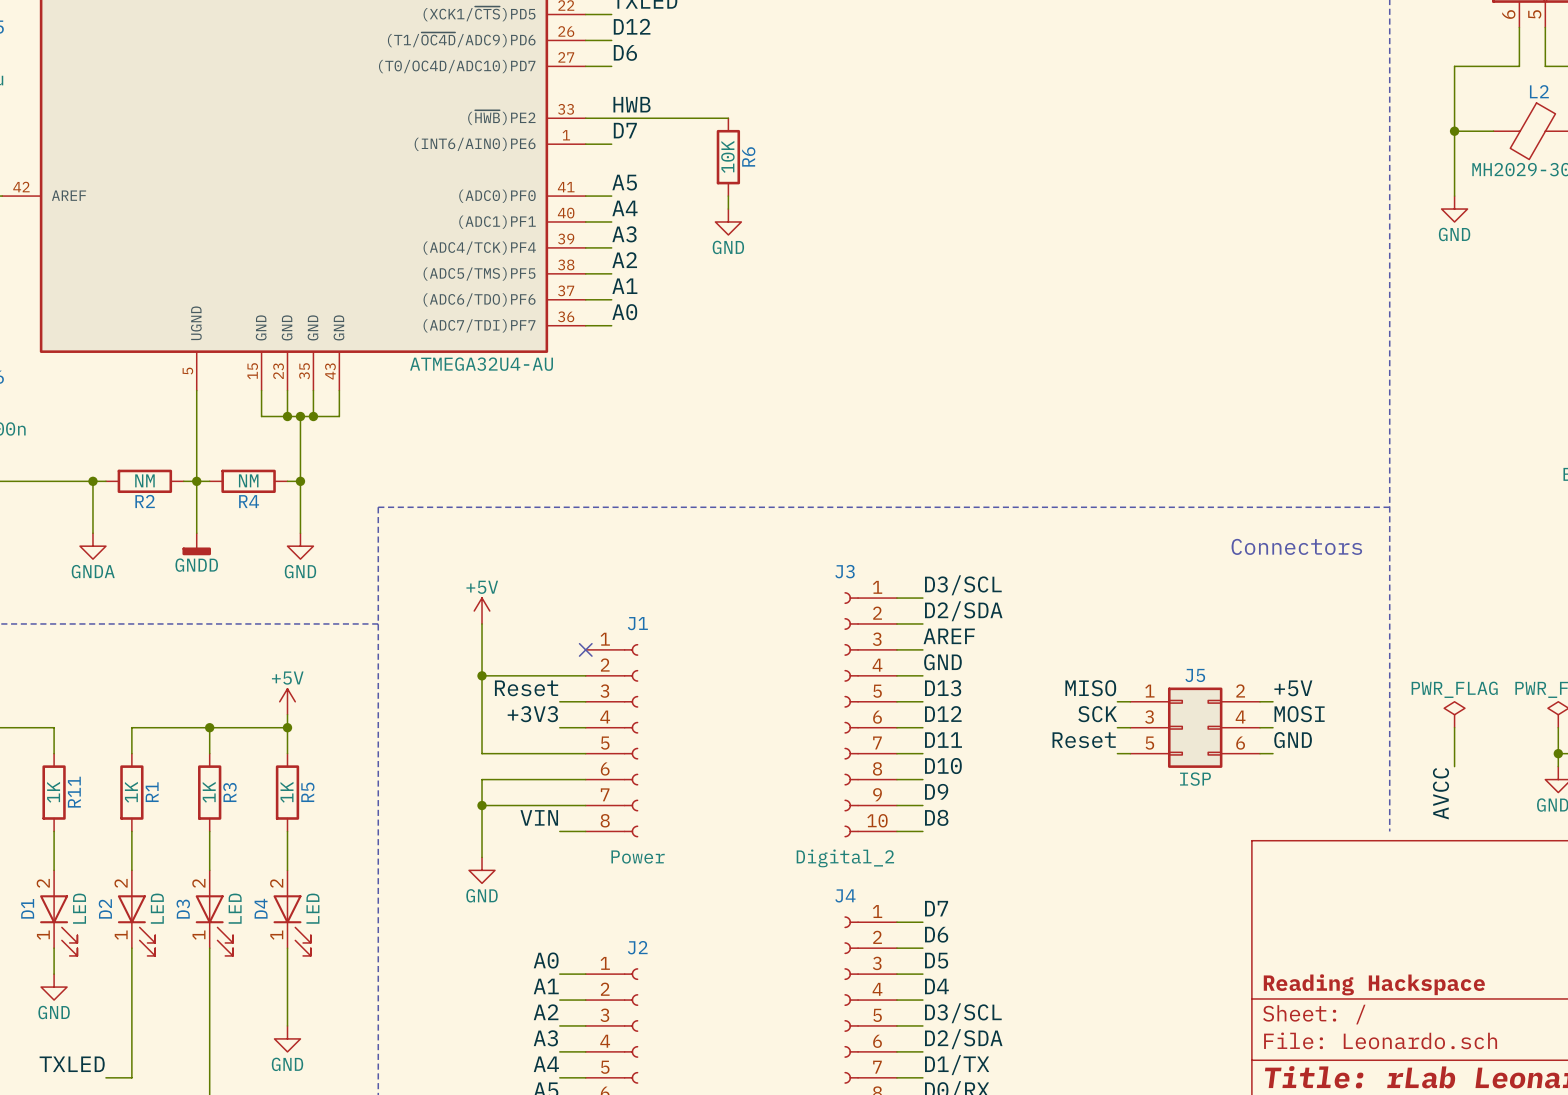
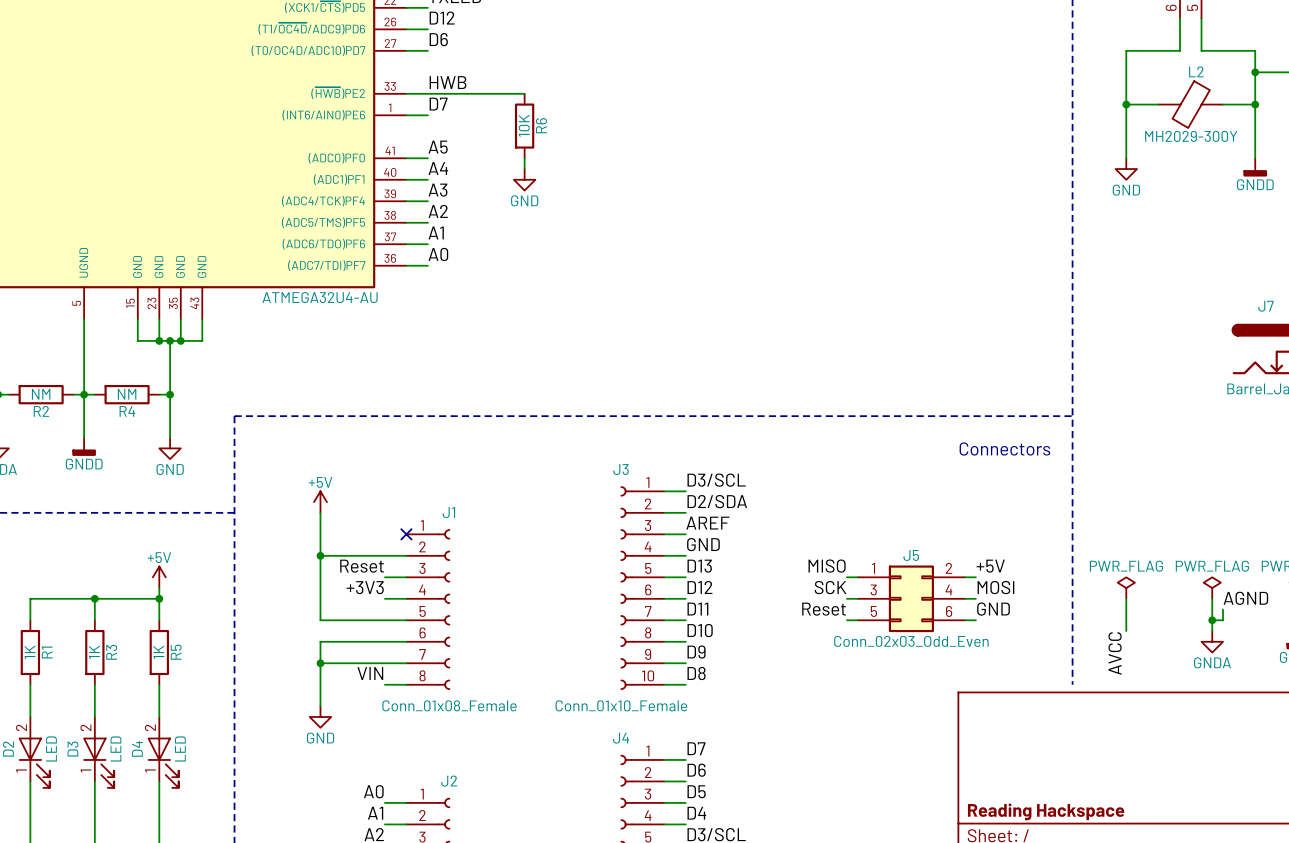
J5 value: ISP (1195, 779) -> Conn_02x03_Odd_Even (911, 641)
J1 value: Power (638, 857) -> Conn_01x08_Female (449, 705)
J3 value: Digital_2 (845, 858) -> Conn_01x10_Female (621, 705)

